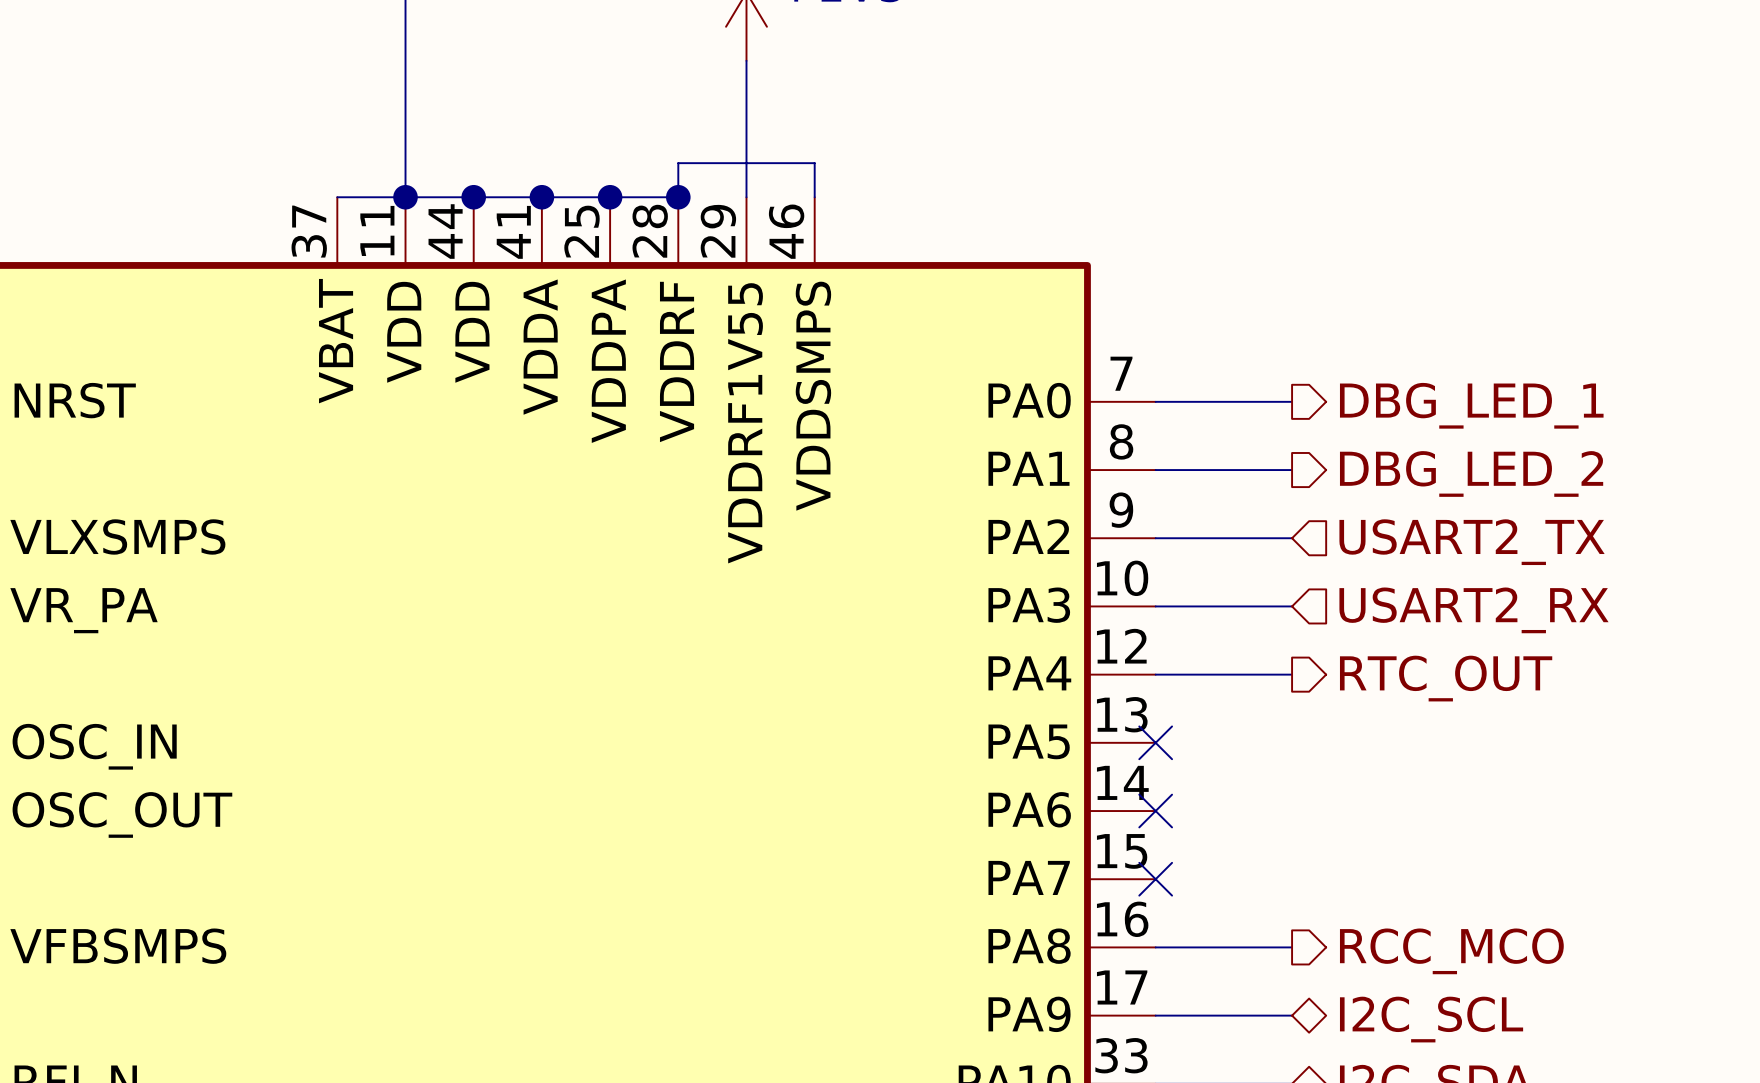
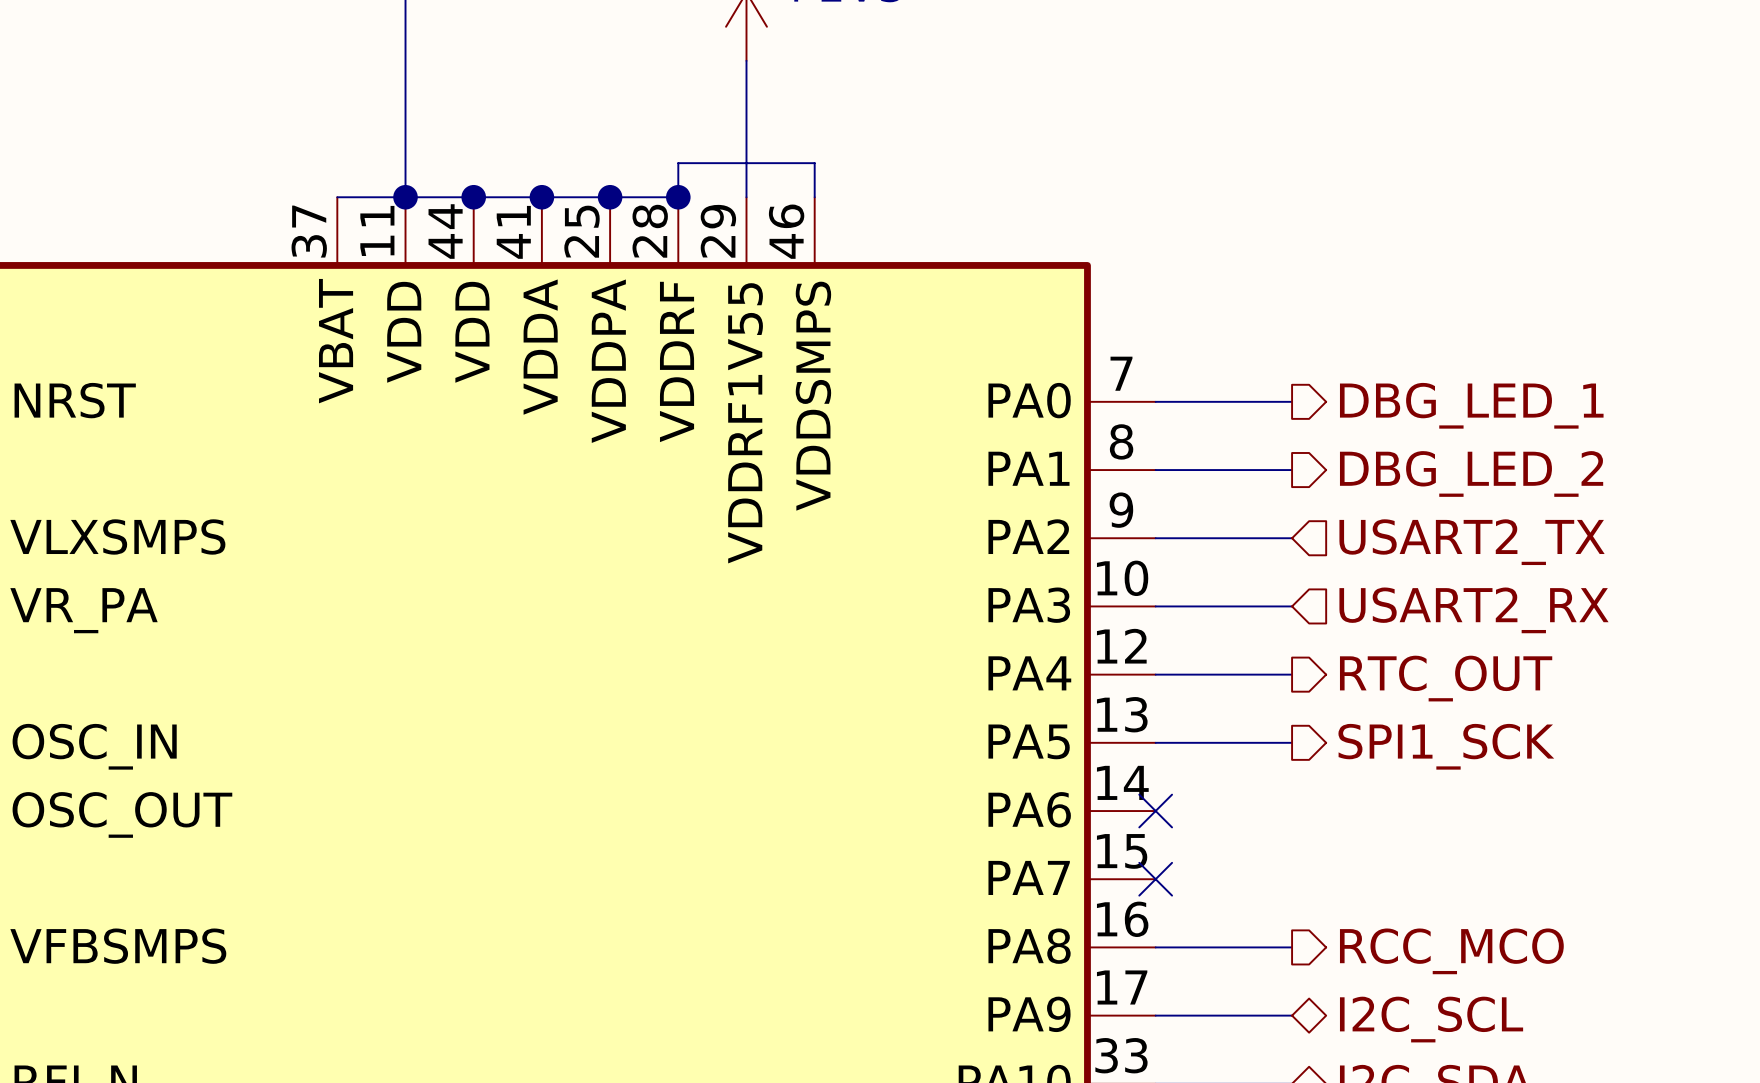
wire: none -> (1155, 742) (1292, 742)
no-connect mark: (1155, 742) -> none
hierarchical label: none -> SPI1_SCK (1446, 746)

